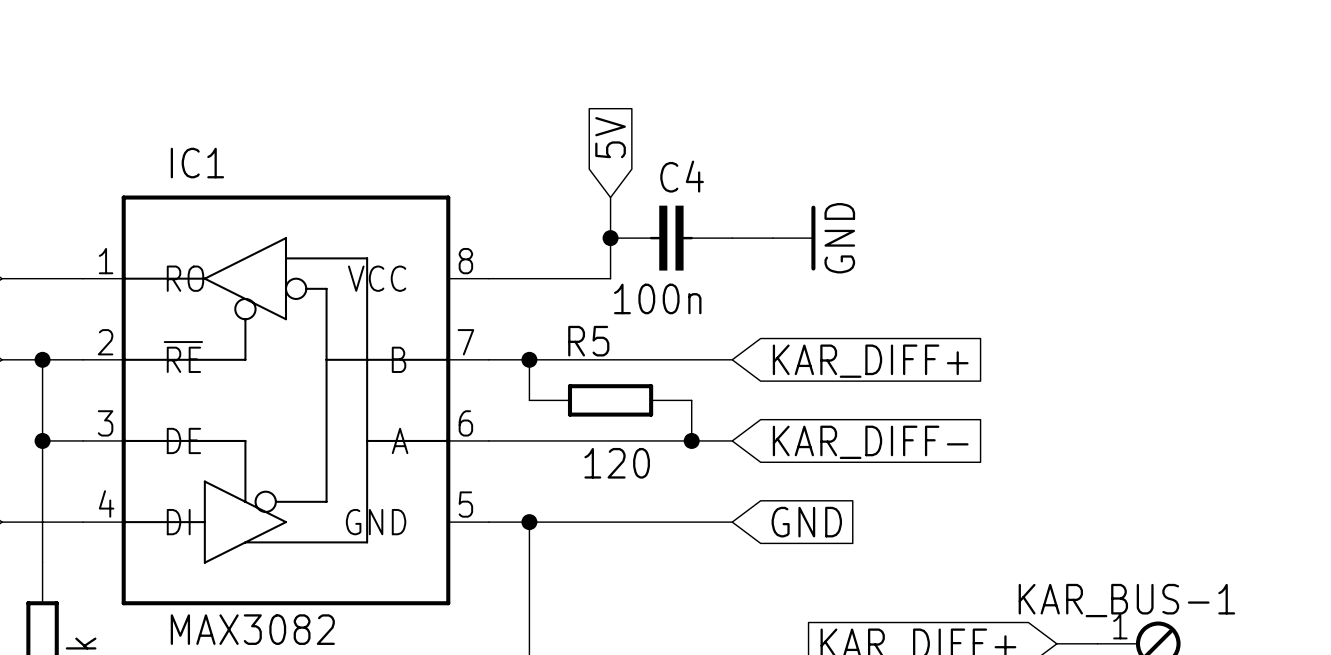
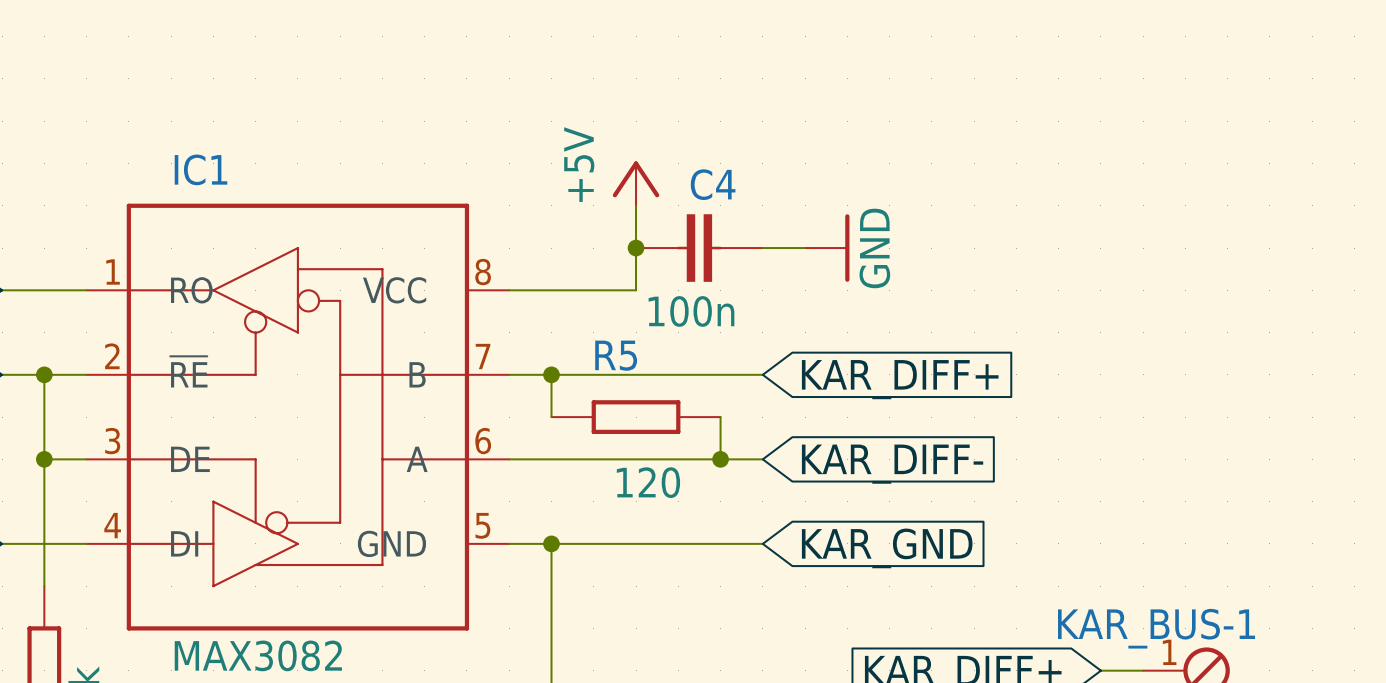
global label: 5V (610, 137) -> none
power symbol: none -> +5V (636, 183)
global label: GND (806, 522) -> KAR_GND (887, 548)

